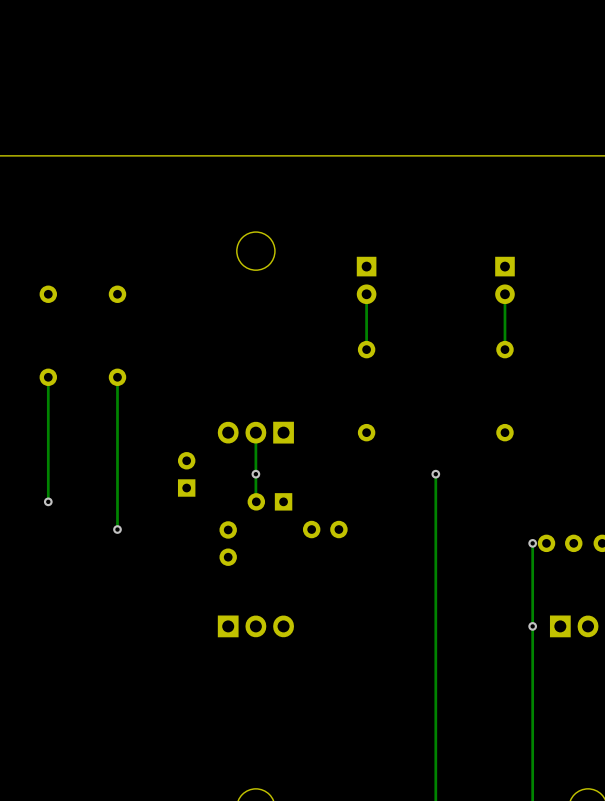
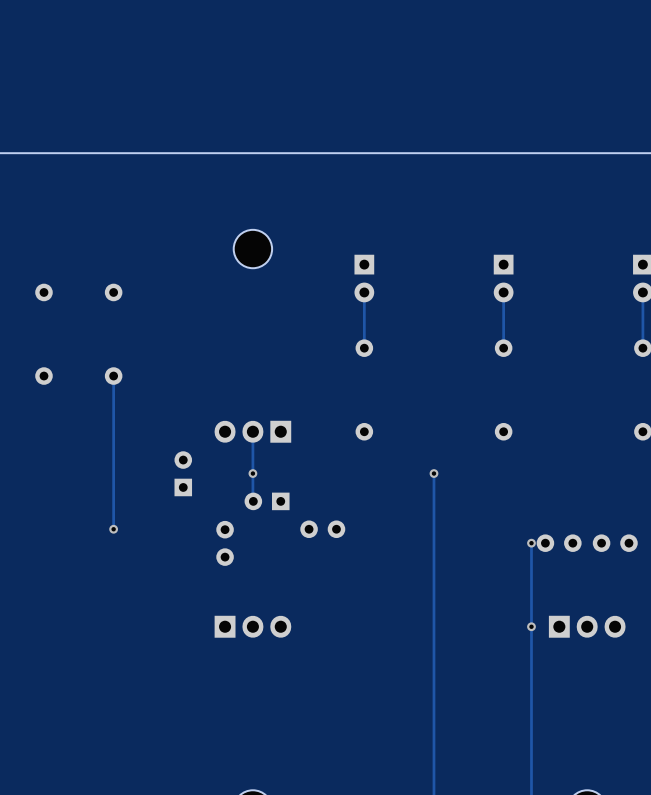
track: (48, 377) (48, 501) -> none
via: (48, 501) -> none

